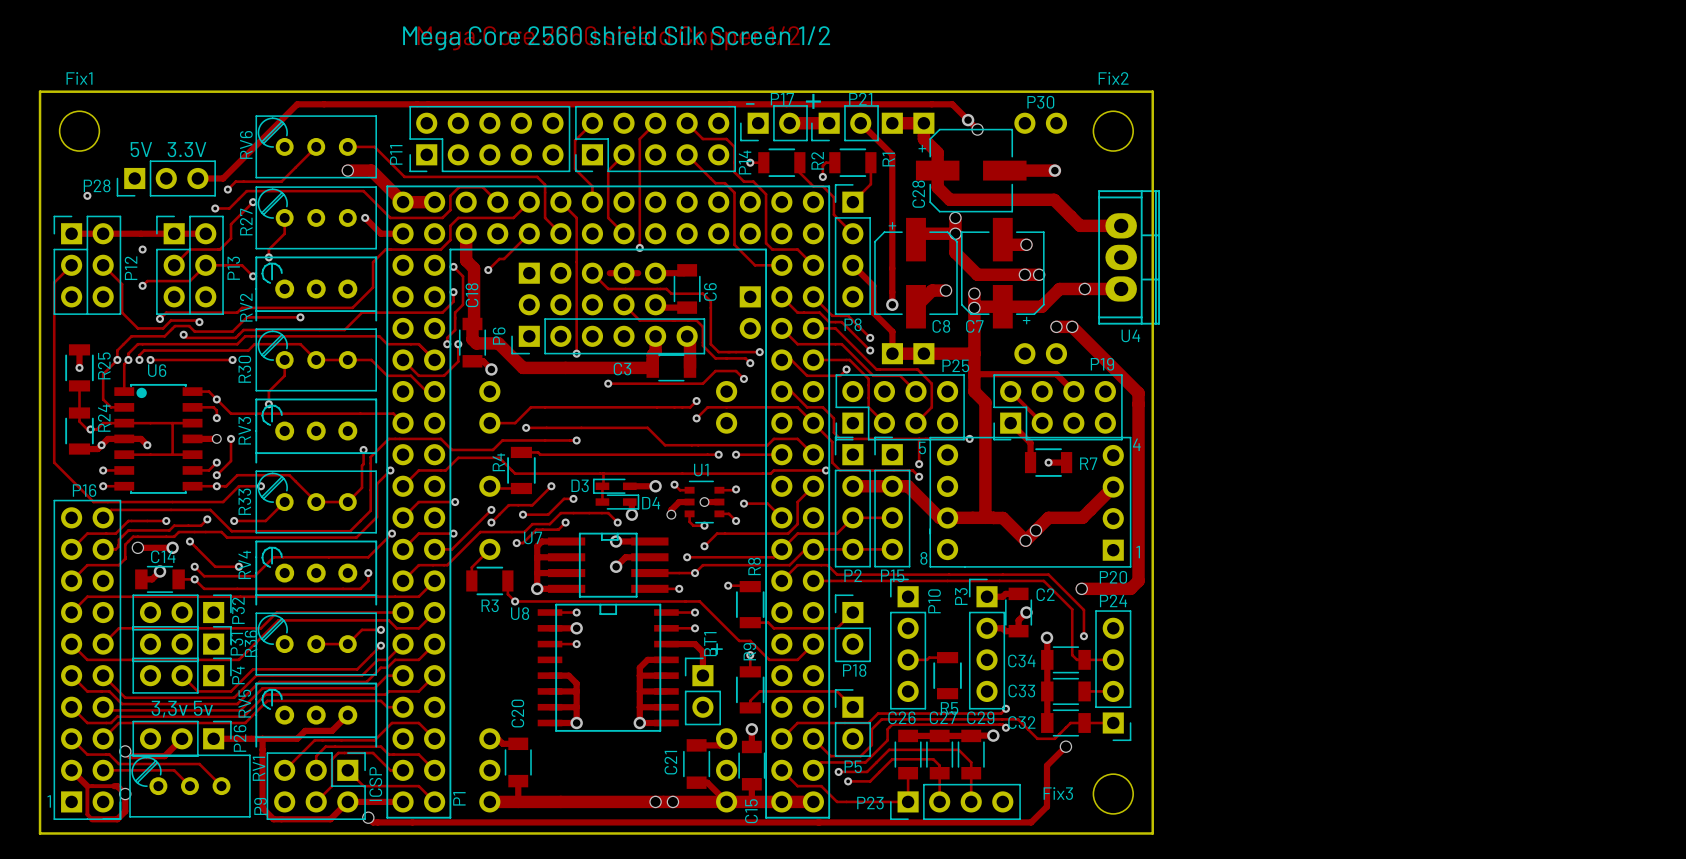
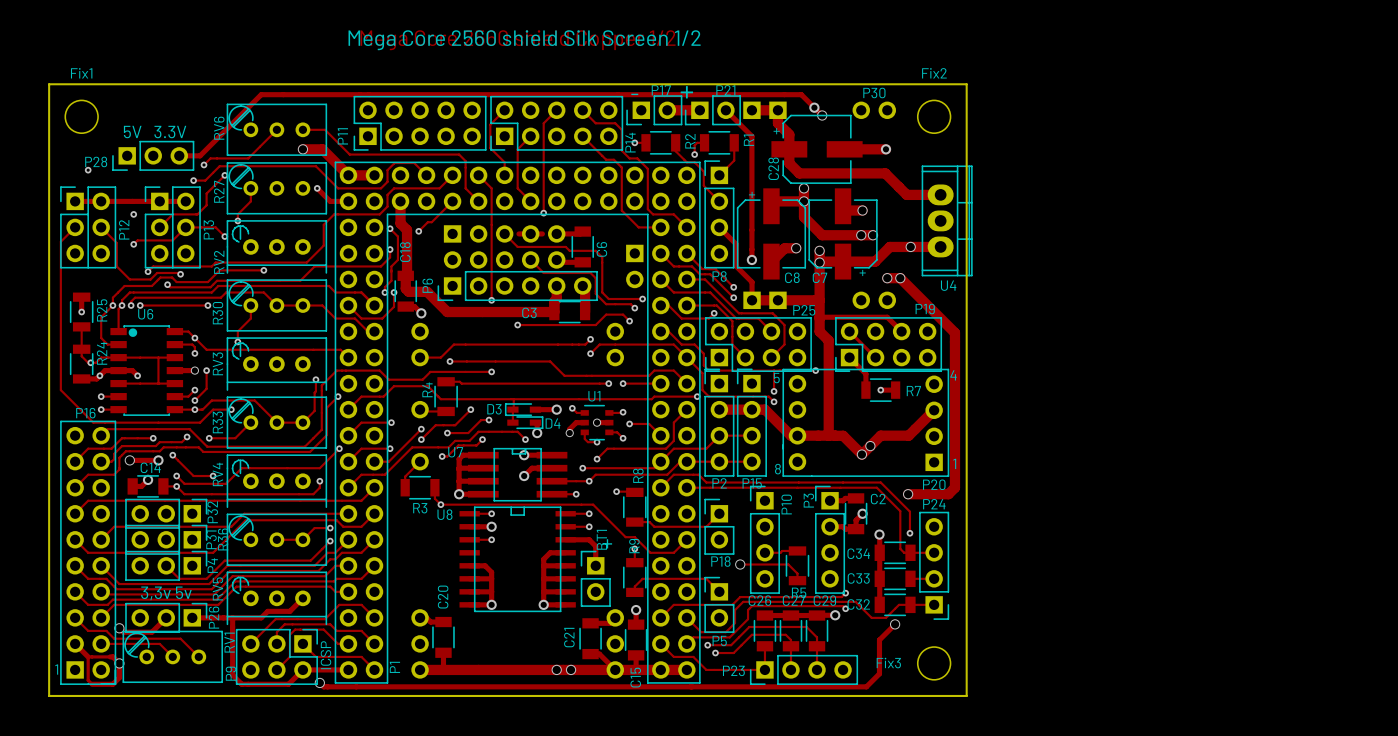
track: none -> (740, 564) (788, 564) (797, 573) (797, 580)
via: none -> (740, 564)

